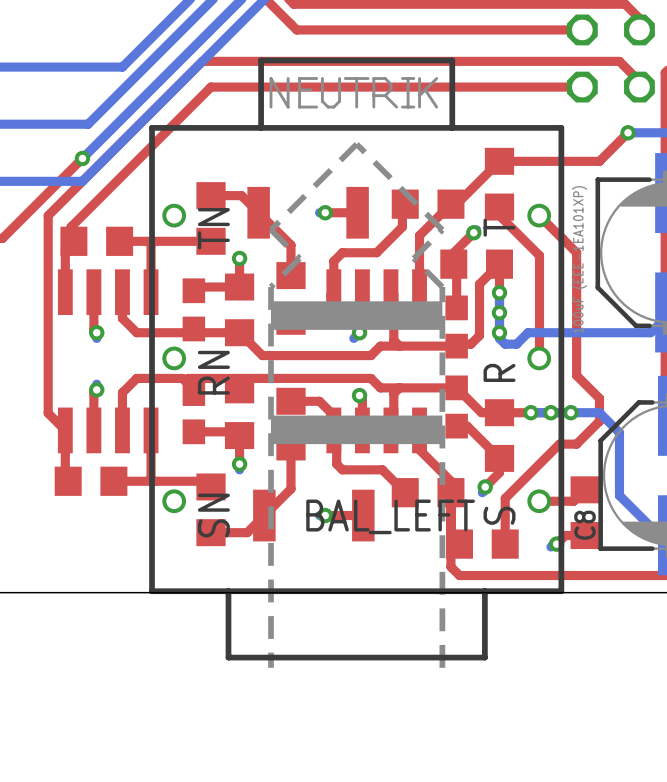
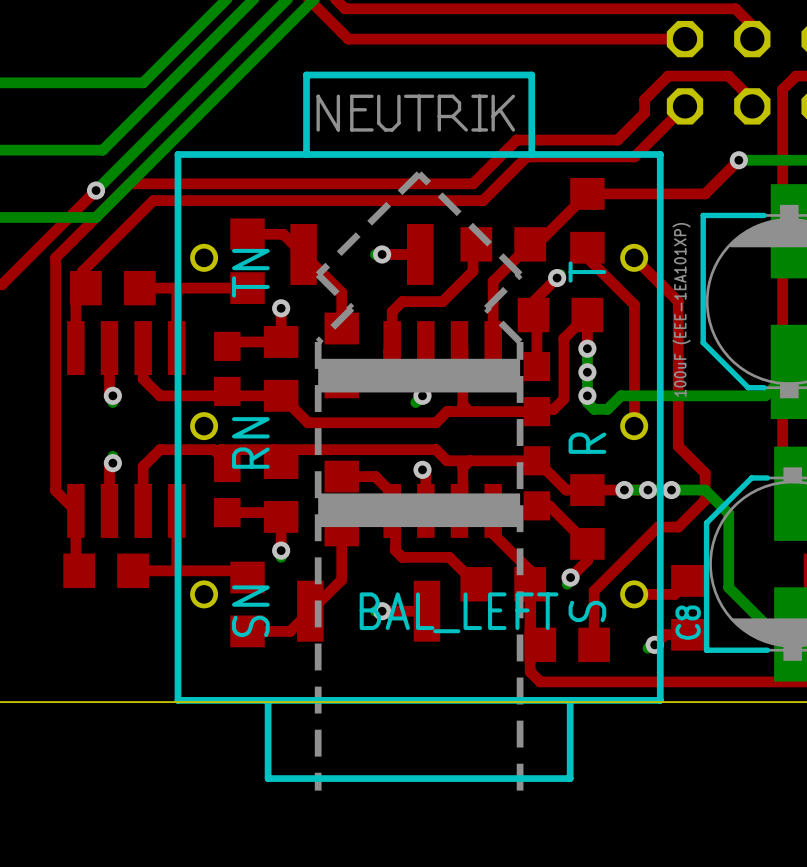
top track: (568, 61) (202, 61) (111, 152) -> (668, 76) (644, 99) (644, 113) (617, 140) (516, 140) (472, 183) (129, 183)
top track: (582, 87) (211, 87) (131, 167) -> (685, 106) (634, 156) (526, 156) (483, 200) (153, 200)

